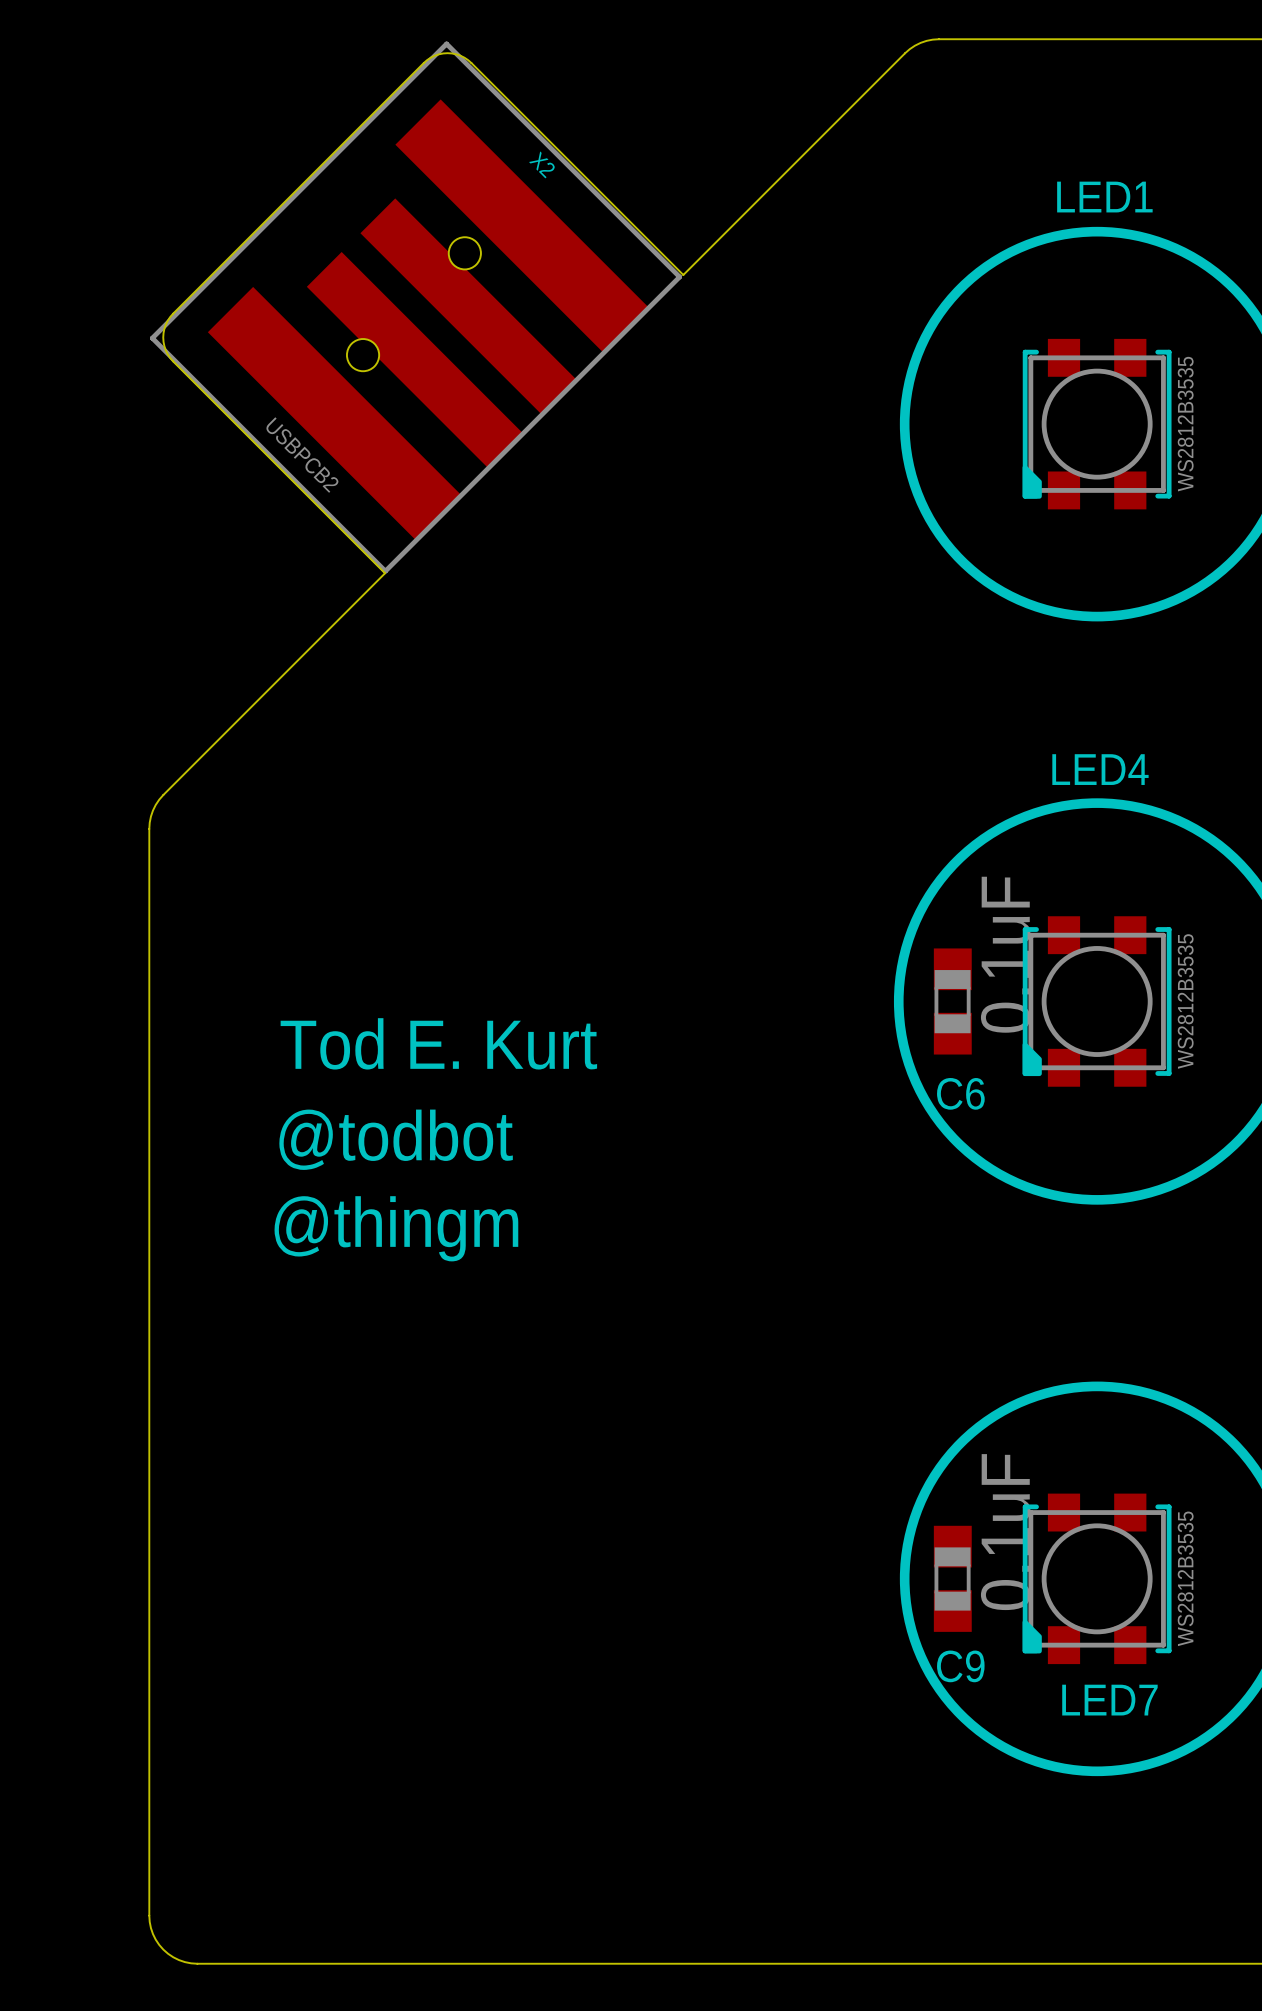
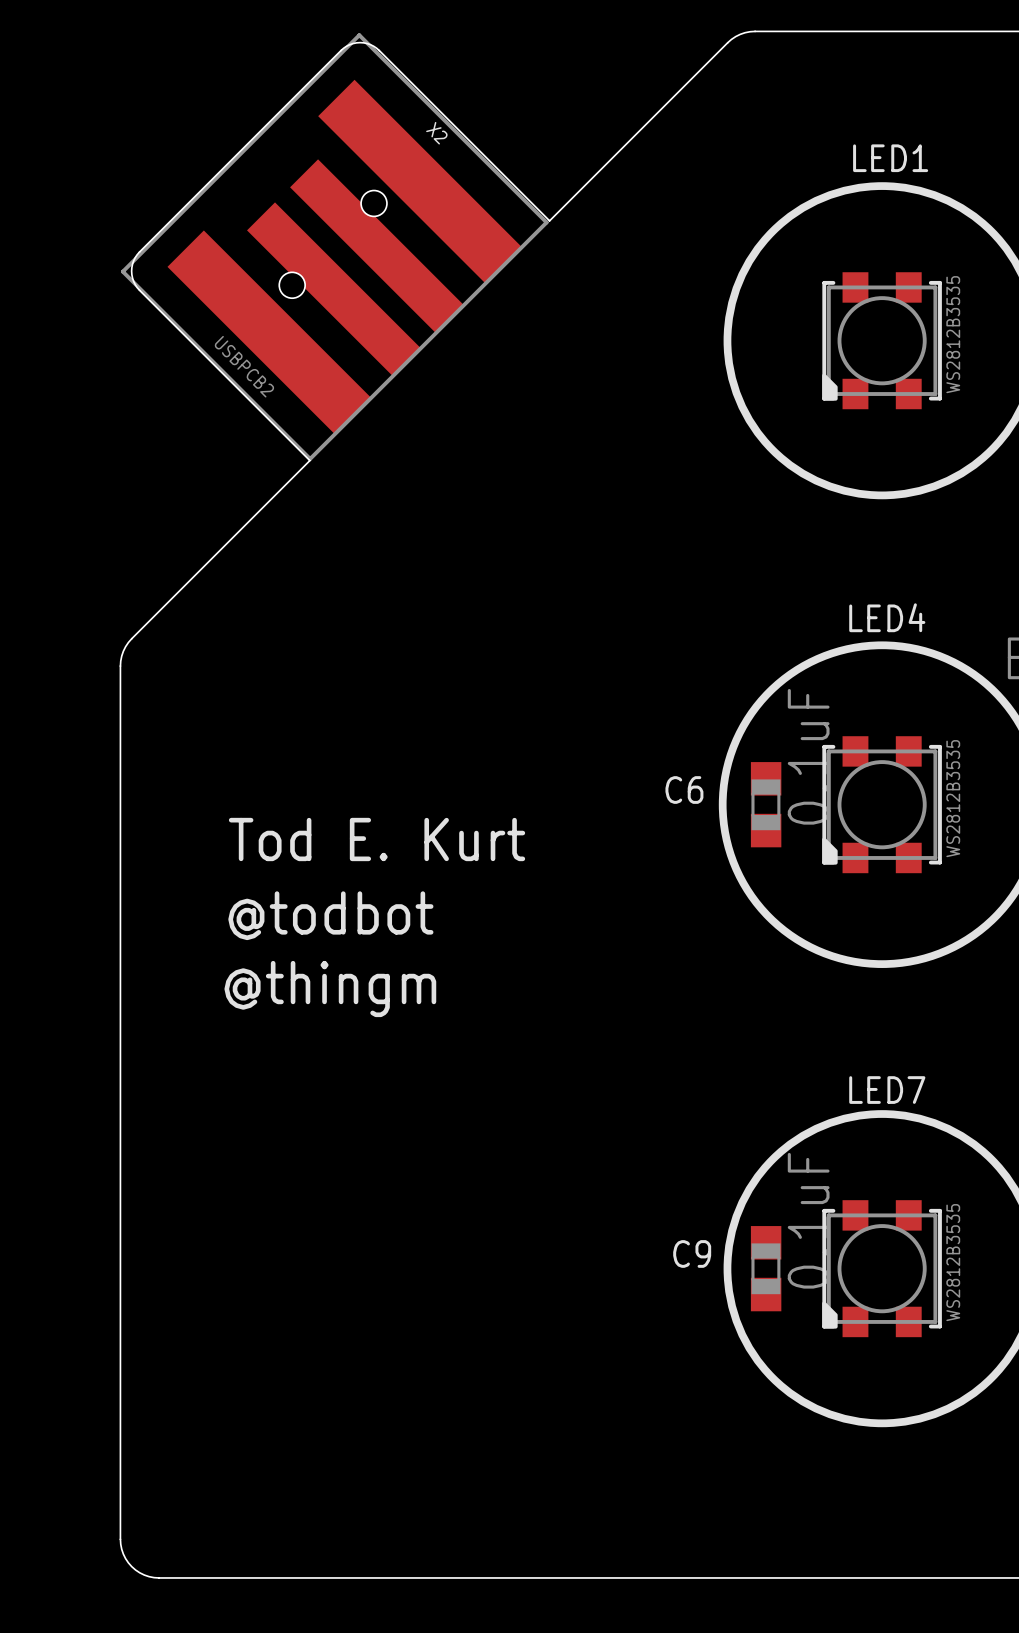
C6 name position: C6 (960, 1093) -> C6 (684, 790)
C9 name position: C9 (960, 1666) -> C9 (692, 1253)
LED7 name position: LED7 (1109, 1700) -> LED7 (887, 1090)

